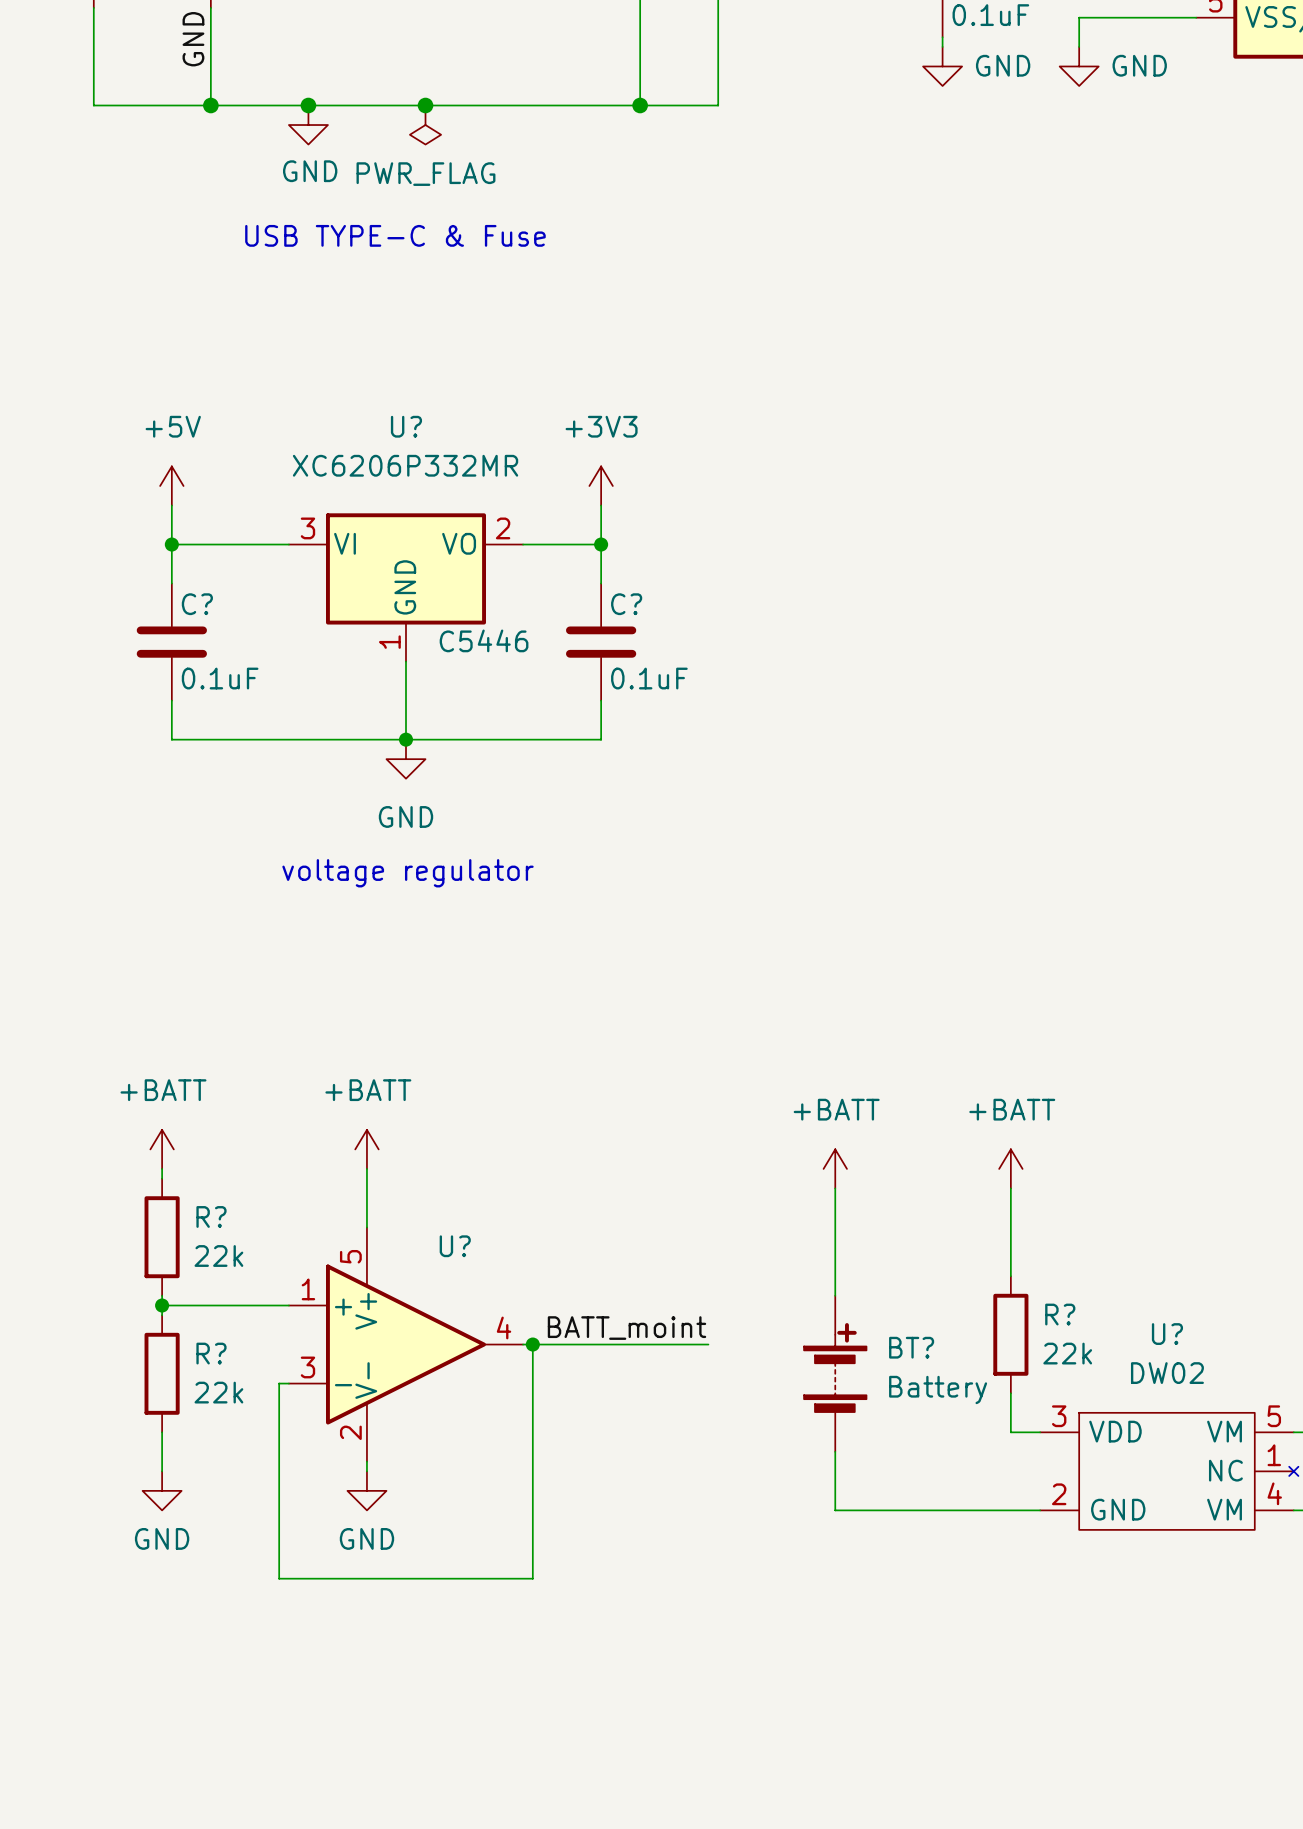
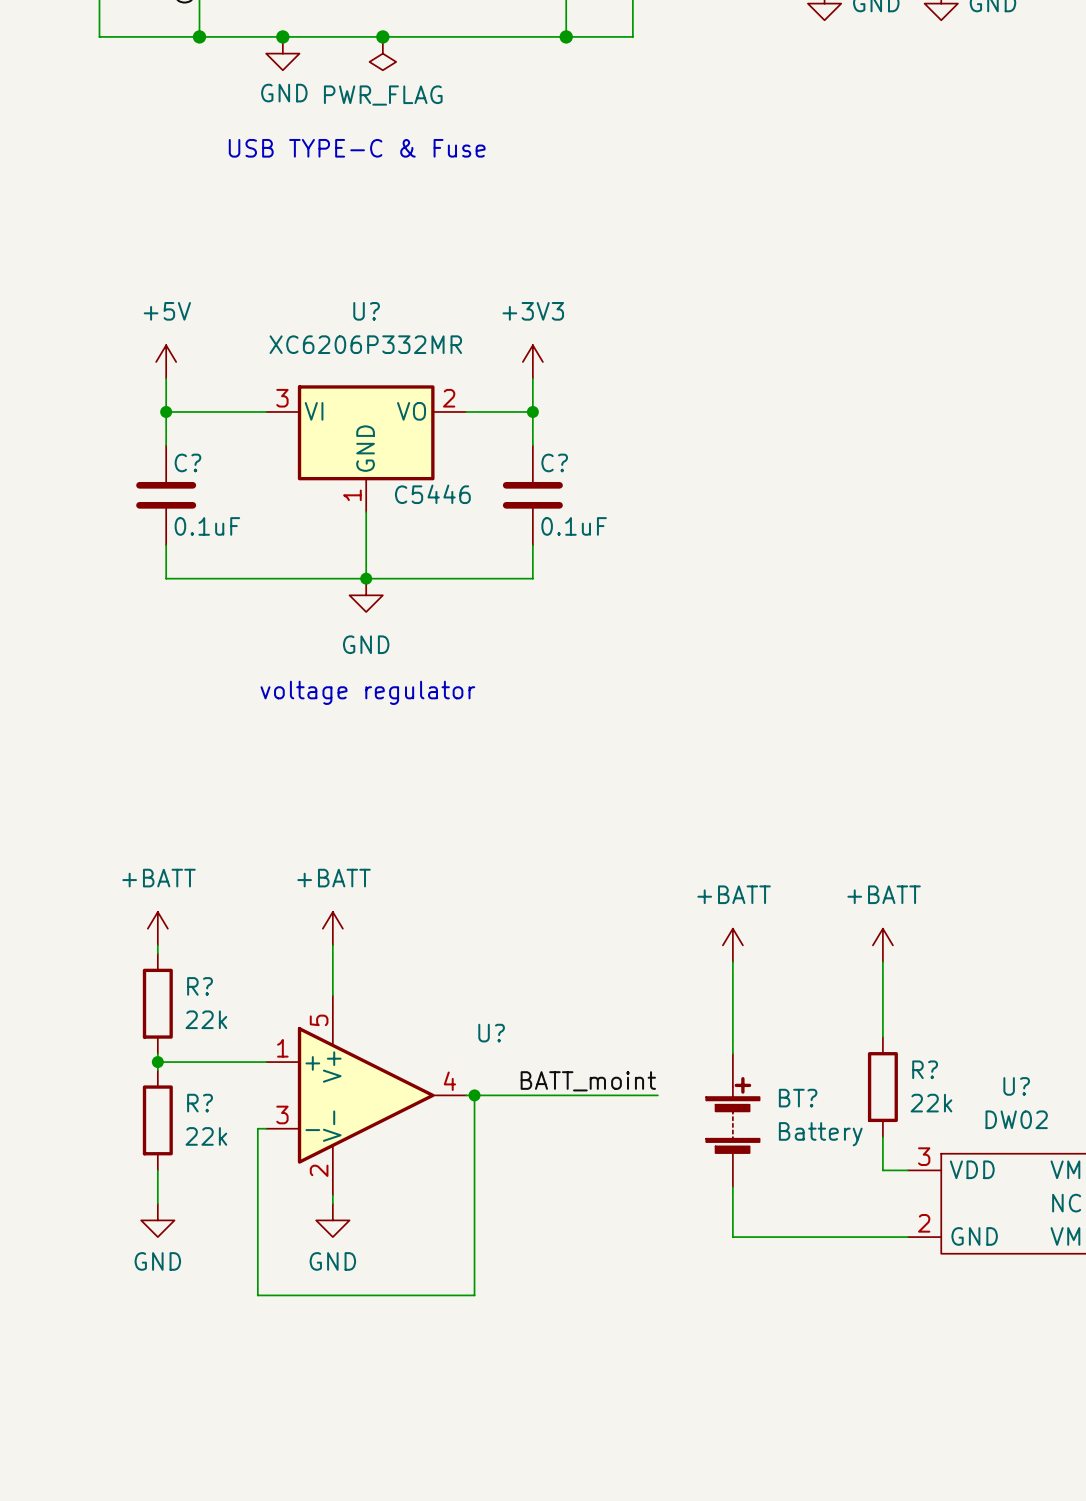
U? name position: U? (455, 1246) -> U? (491, 1033)
label position: BATT_moint (626, 1328) -> BATT_moint (588, 1081)
wire: none -> (624, 1095) (657, 1095)

